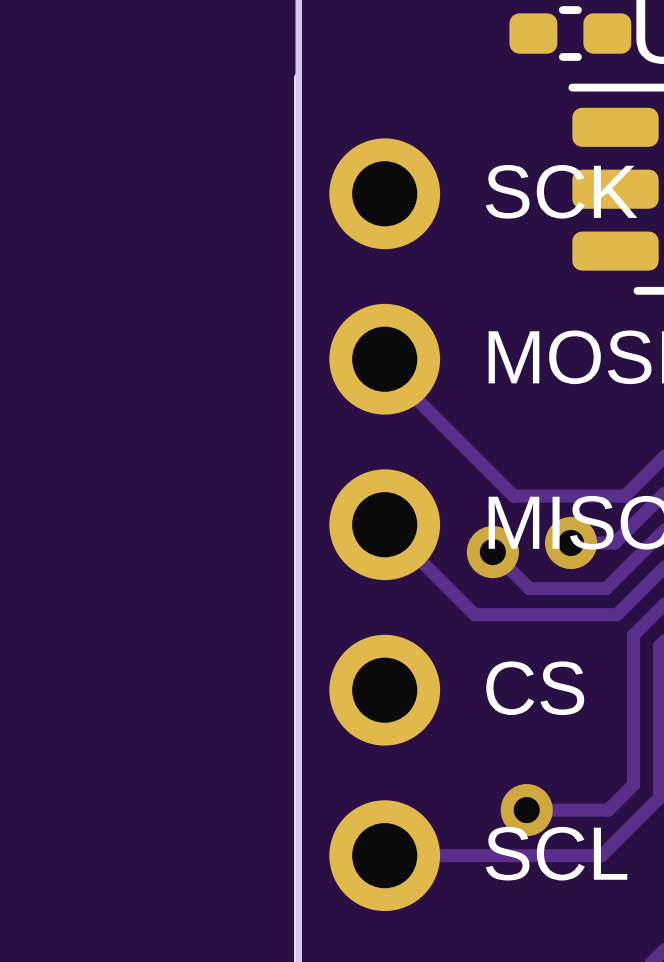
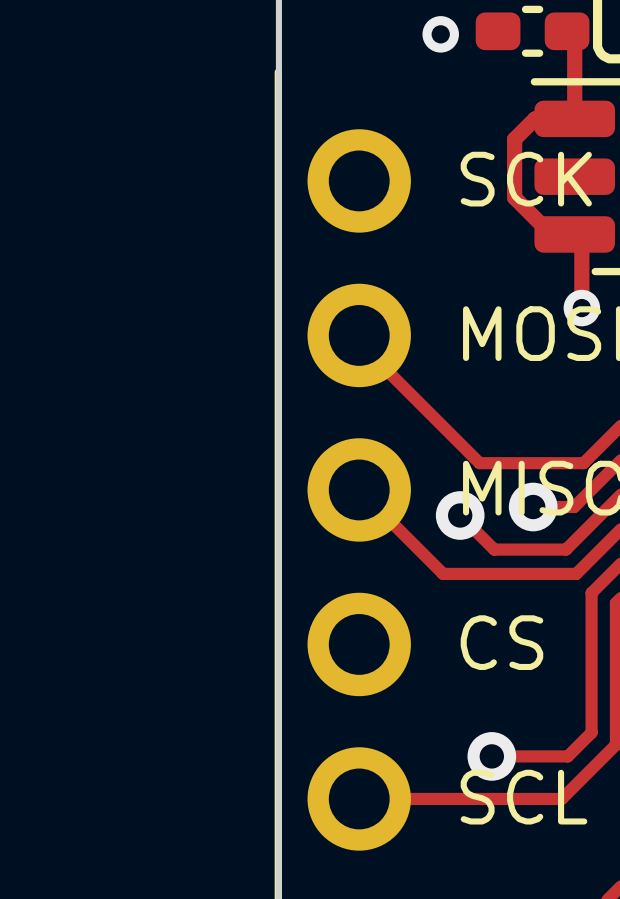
track: none -> (567, 31) (574, 38) (574, 118) (535, 118) (514, 139) (514, 197) (551, 234) (574, 234) (581, 241) (581, 308)
via: none -> (440, 34)
via: none -> (581, 308)

